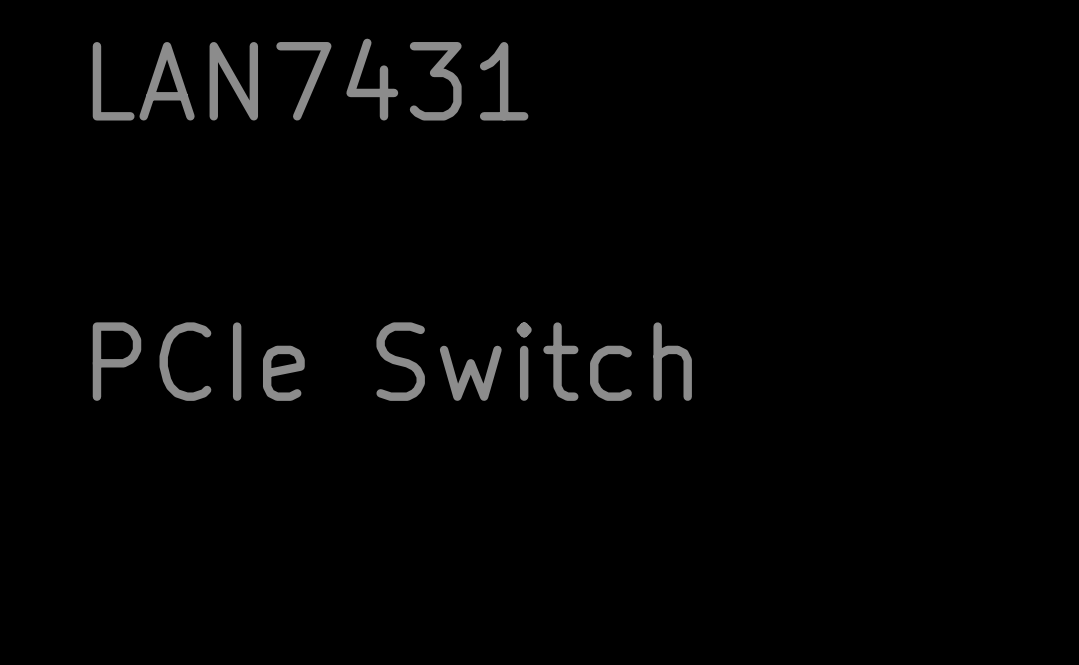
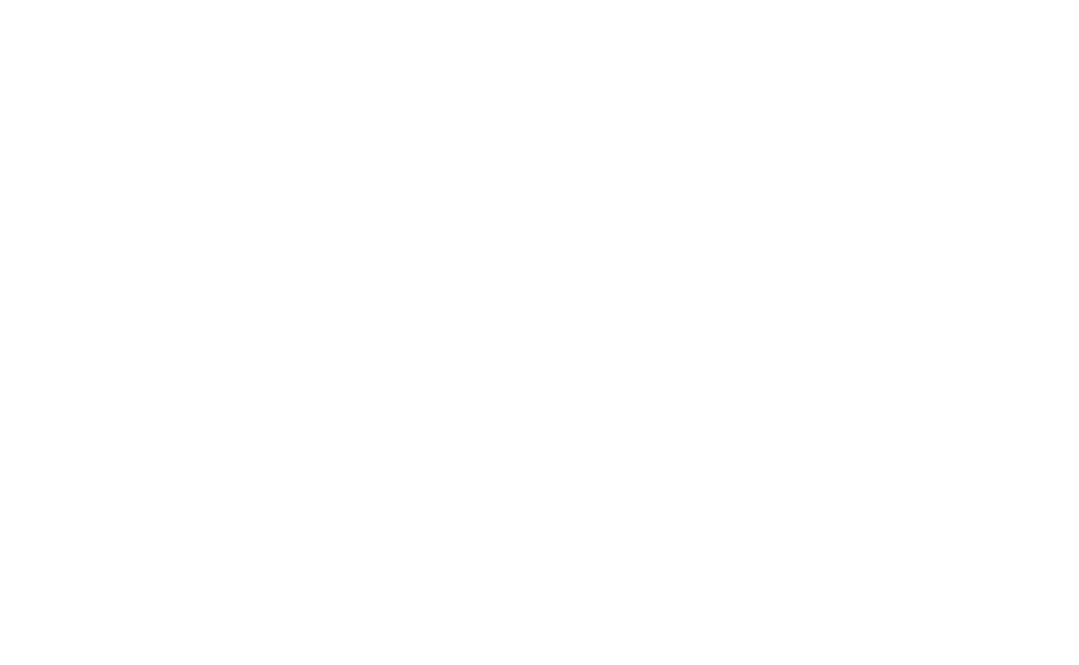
text: LAN7431 (310, 79) -> none
text: PCIe Switch (392, 361) -> none

